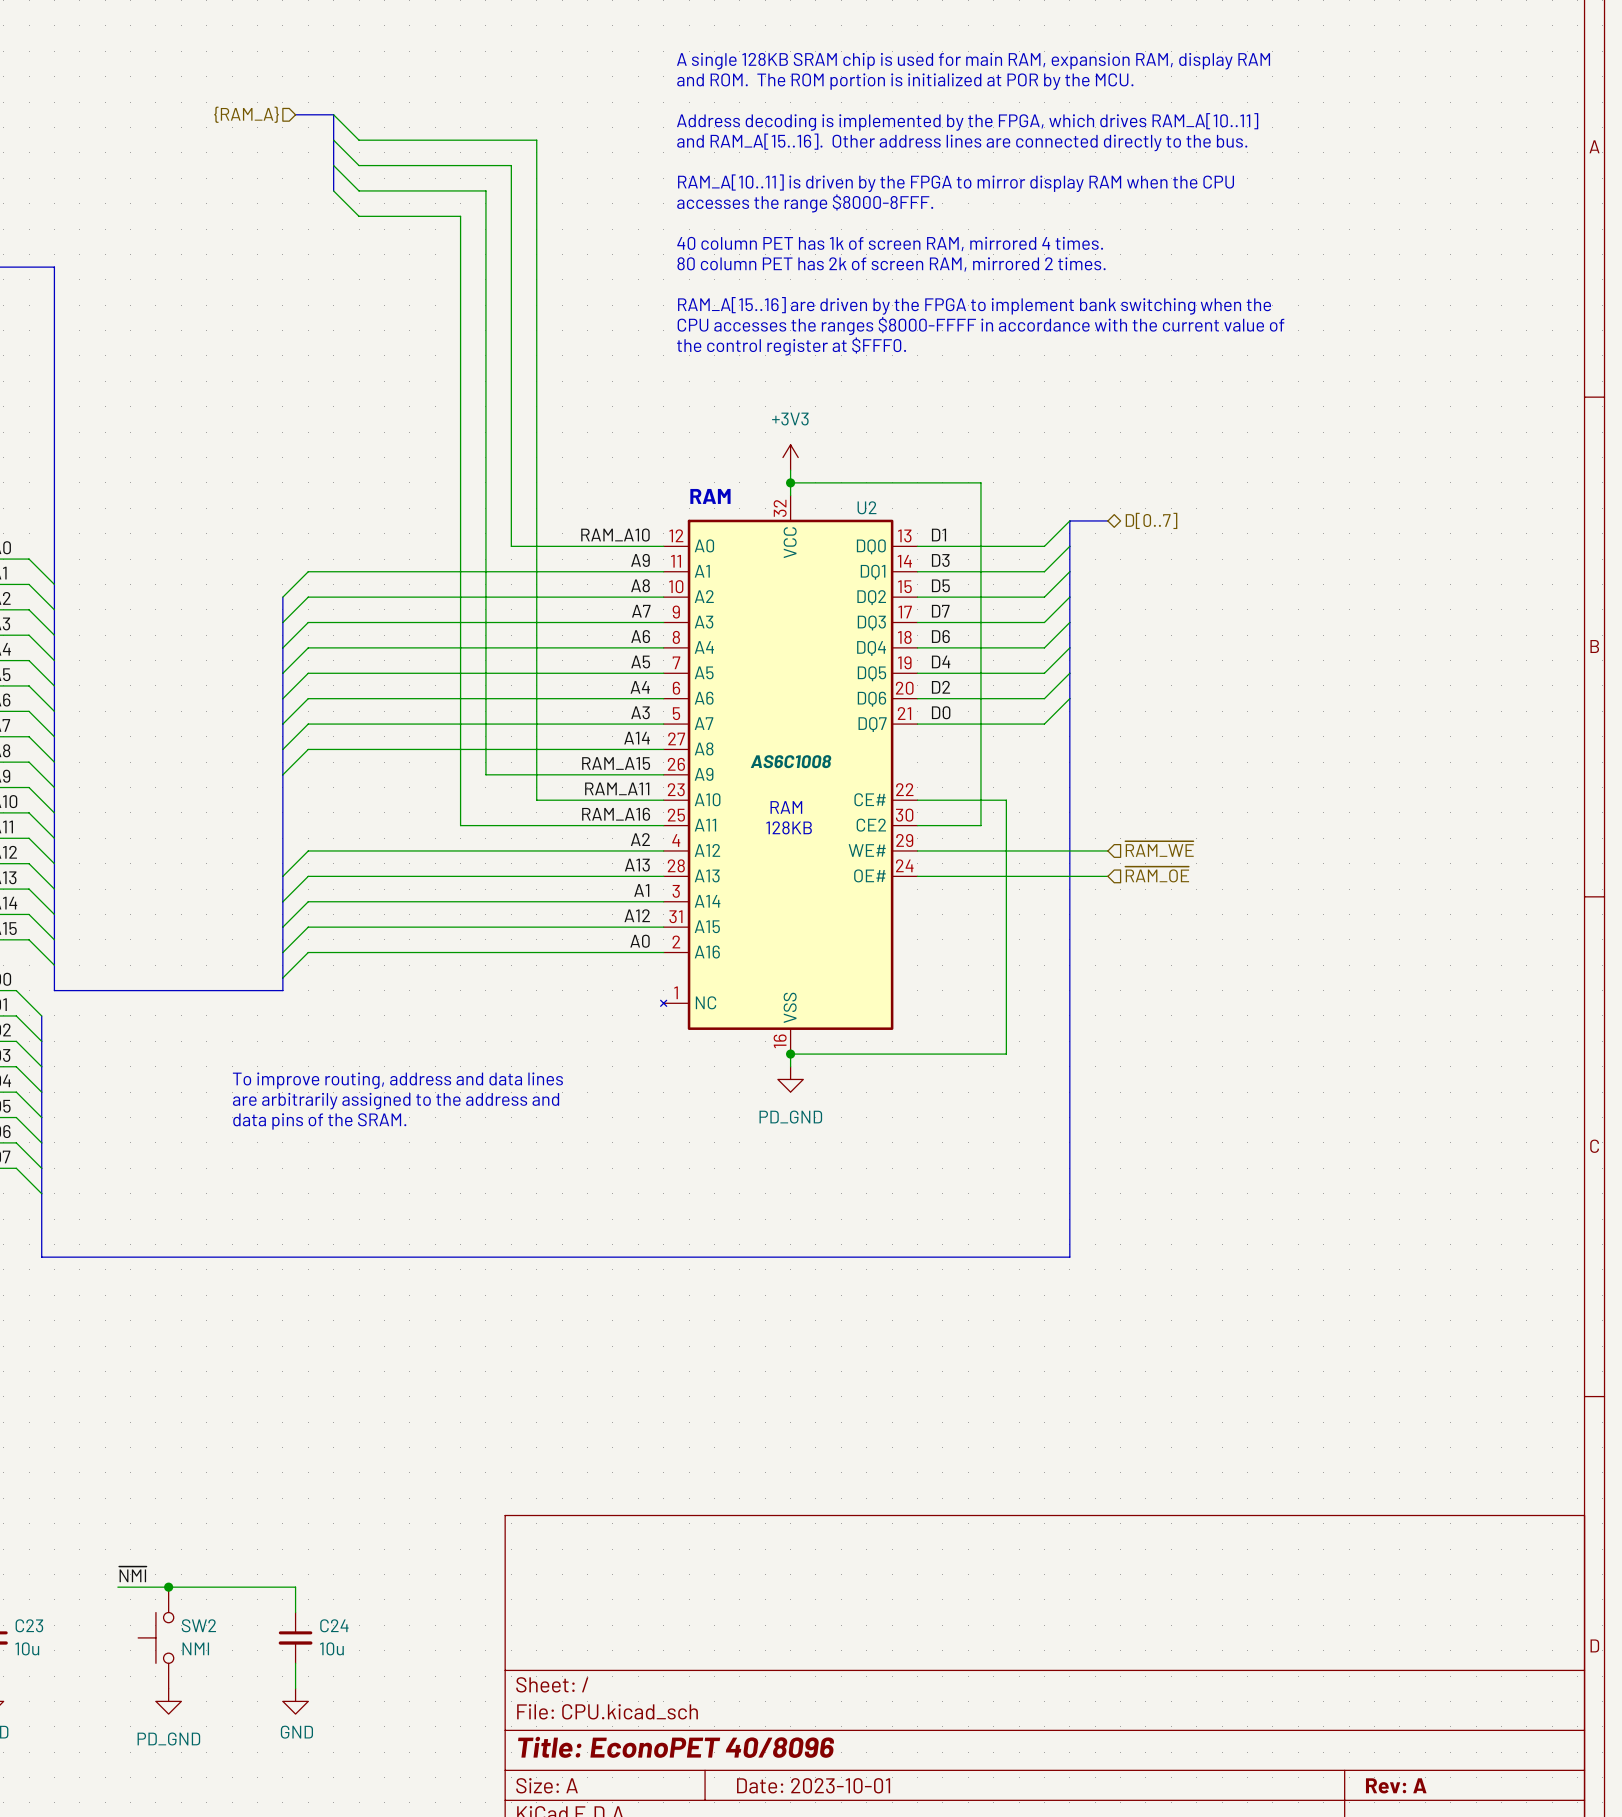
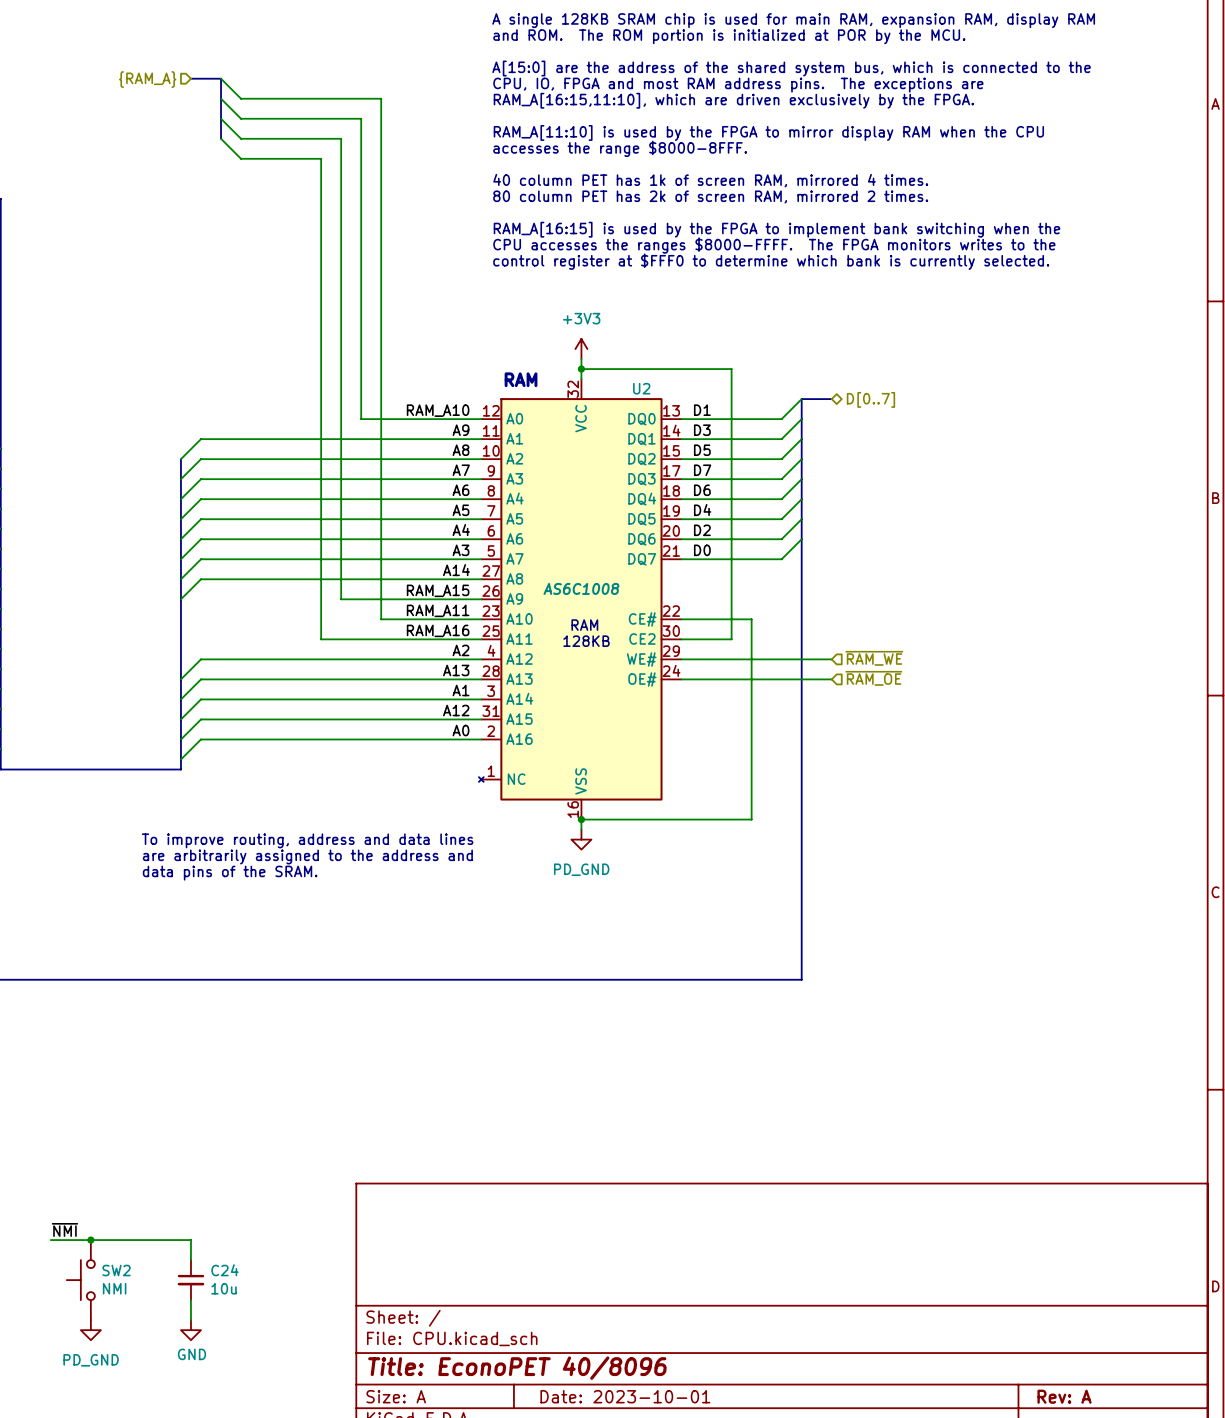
text: none -> A single 128KB SRAM chip is used for main RAM, expansion RAM, display RAM (793, 20)
text: A single 128KB SRAM chip is used for main RAM, expansion RAM, display RAM (973, 61) -> and ROM. The ROM portion is initialized at POR by the MCU. (729, 36)
text: and ROM. The ROM portion is initialized at POR by the MCU. (905, 81) -> none
text: none -> A[15:0] are the address of the shared system bus, which is connected to the (791, 68)
text: Address decoding is implemented by the FPGA, which drives RAM_A[10..11] (967, 121) -> CPU, IO, FPGA and most RAM address pins. The exceptions are (738, 85)
text: and RAM_A[15..16]. Other address lines are connected directly to the bus. (962, 142) -> RAM_A[16:15,11:10], which are driven exclusively by the FPGA. (733, 100)
text: RAM_A[10..11] is driven by the FPGA to mirror display RAM when the CPU (956, 183) -> RAM_A[11:10] is used by the FPGA to mirror display RAM when the CPU (768, 132)
text: RAM_A[15..16] are driven by the FPGA to implement bank switching when the (974, 305) -> RAM_A[16:15] is used by the FPGA to implement bank switching when the (776, 229)
text: CPU accesses the ranges $8000-FFFF in accordance with the current value of (980, 326) -> CPU accesses the ranges $8000-FFFF. The FPGA monitors writes to the (774, 245)
text: the control register at $FFF0. (791, 346) -> control register at $FFF0 to determine which bank is currently selected. (771, 261)

